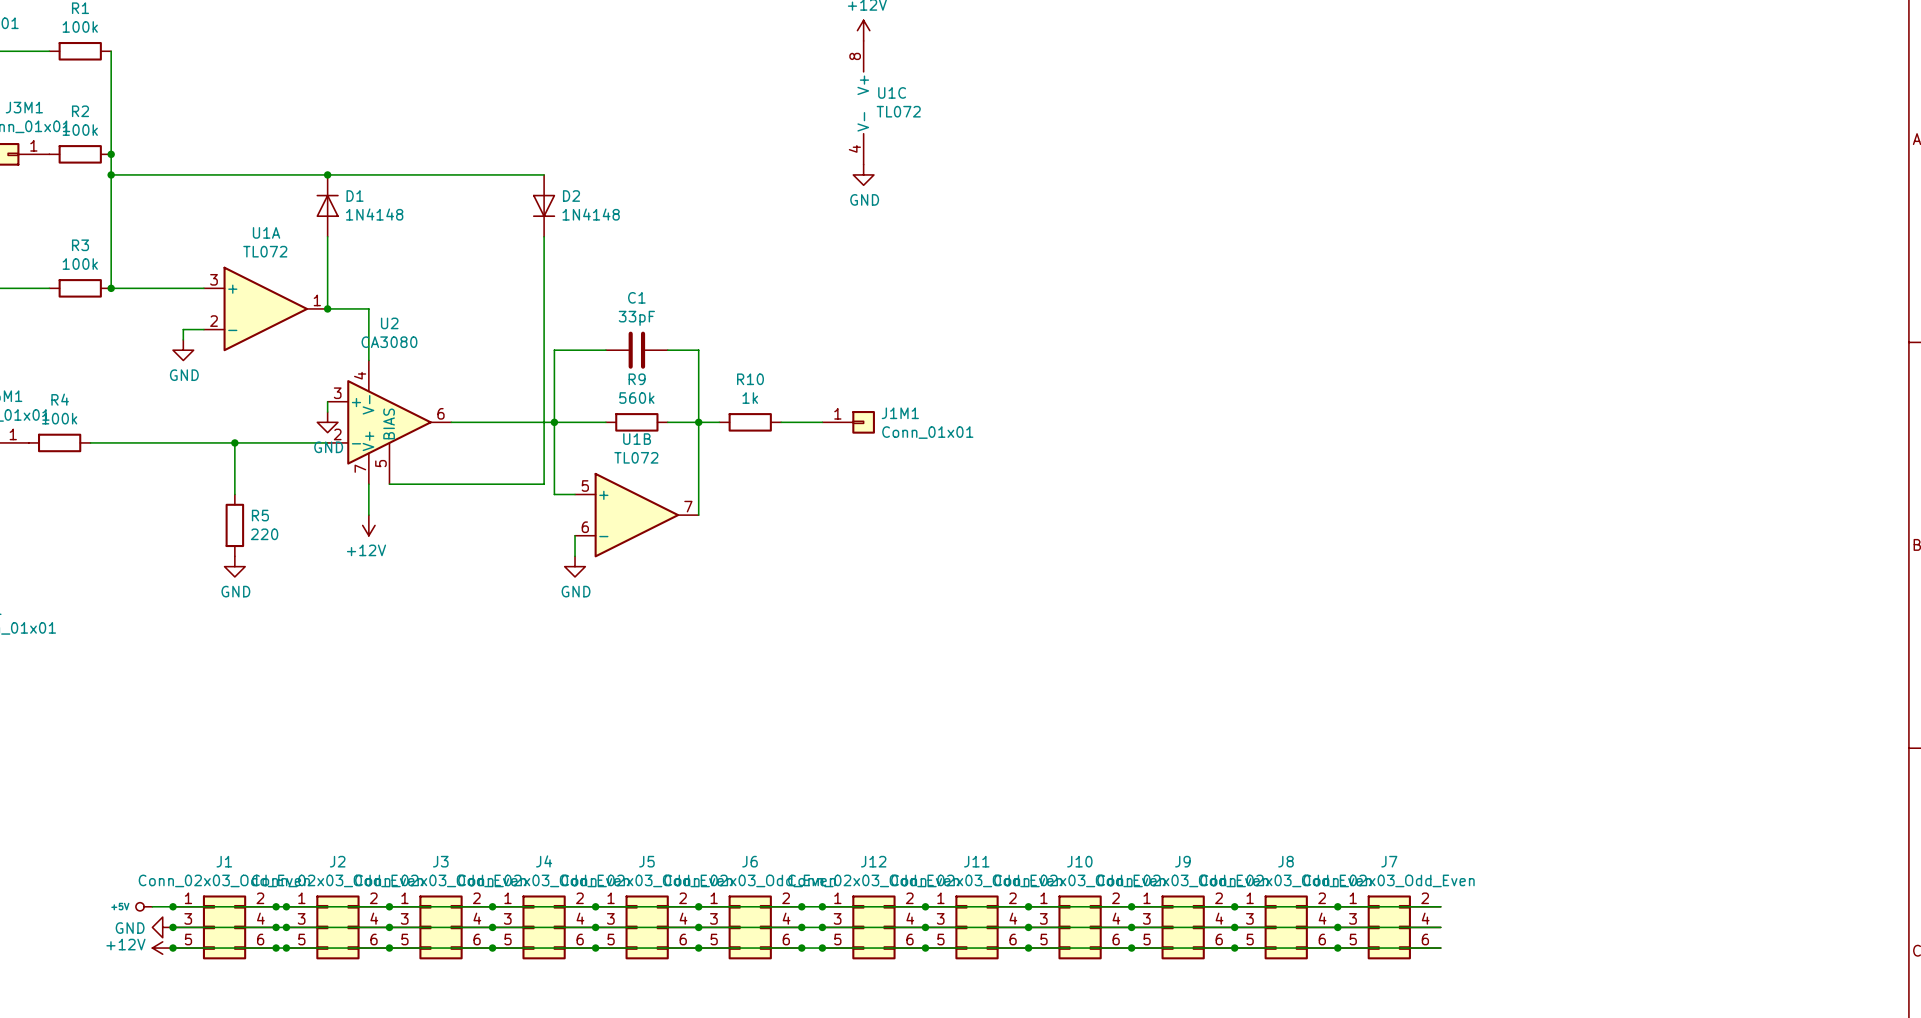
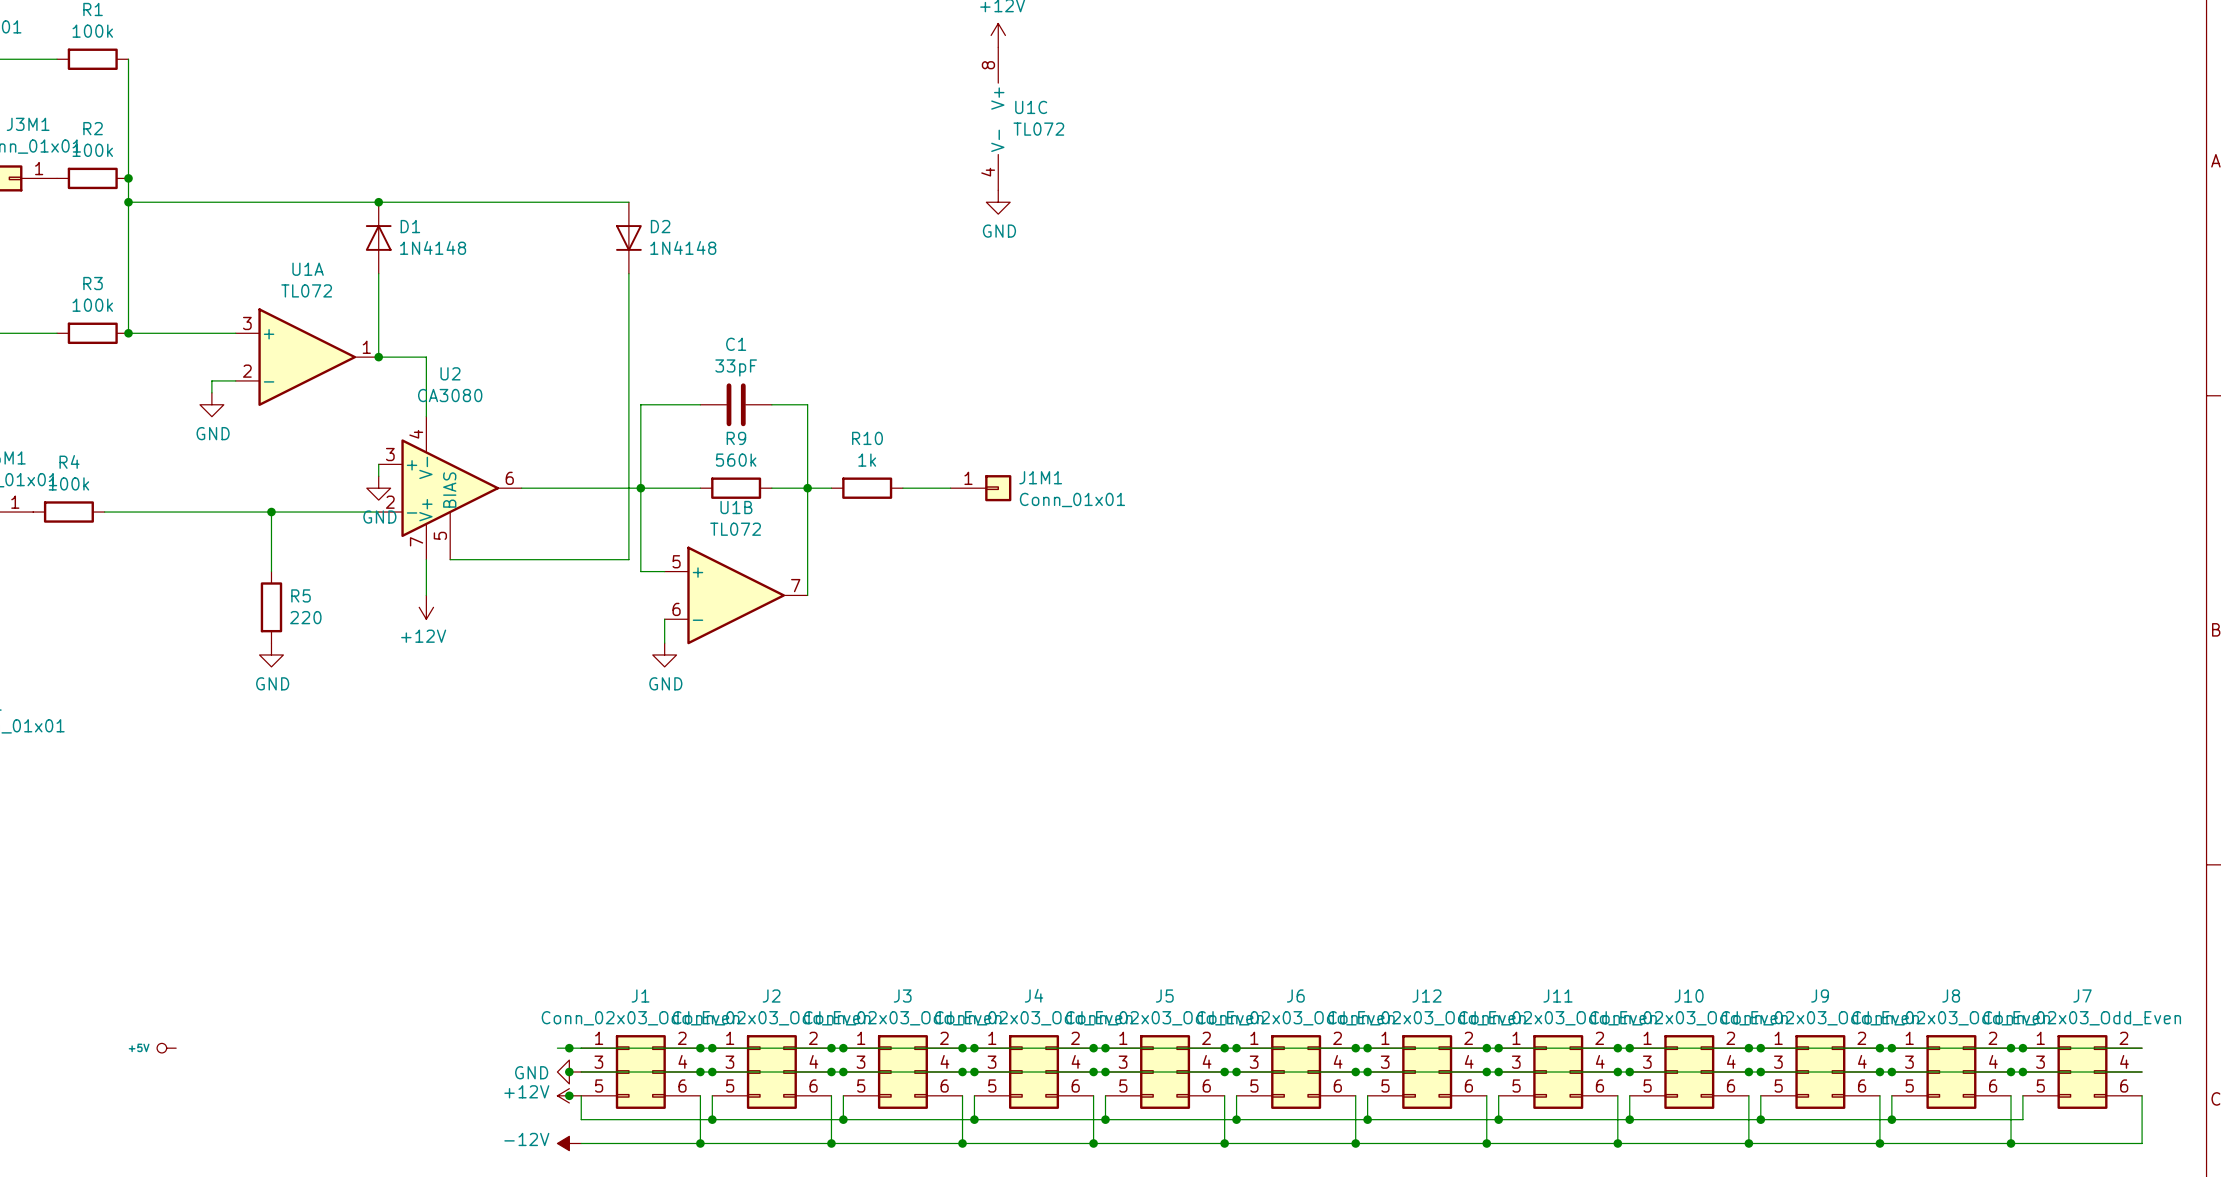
wire: (152, 906) (482, 906) -> none
junction: (173, 906) -> none
junction: (276, 906) -> none
junction: (286, 906) -> none
junction: (389, 906) -> none
junction: (595, 906) -> none
junction: none -> (700, 1048)
junction: none -> (712, 1048)
junction: (698, 906) -> none
junction: none -> (831, 1048)
junction: none -> (843, 1048)
junction: (801, 906) -> none
junction: (822, 906) -> none
junction: none -> (962, 1048)
junction: none -> (974, 1048)
junction: (925, 906) -> none
junction: none -> (1093, 1048)
junction: none -> (1105, 1048)
junction: (1028, 906) -> none
junction: none -> (1224, 1048)
junction: none -> (1236, 1048)
junction: (1131, 906) -> none
junction: none -> (1355, 1048)
junction: none -> (1367, 1048)
junction: (1234, 906) -> none
junction: none -> (1486, 1048)
junction: none -> (1498, 1048)
junction: (1337, 906) -> none
junction: none -> (1617, 1048)
junction: none -> (1629, 1048)
wire: none -> (1665, 1048) (2142, 1048)
junction: none -> (1748, 1048)
junction: none -> (1760, 1048)
junction: none -> (1879, 1048)
junction: none -> (1891, 1048)
junction: none -> (2011, 1048)
junction: none -> (2022, 1048)
power symbol: GND (162, 927) -> none
wire: (173, 927) (502, 927) -> none
junction: (173, 927) -> none
J1 position: (224, 927) -> (640, 1072)
junction: (276, 927) -> none
junction: (286, 927) -> none
J2 position: (337, 927) -> (771, 1072)
junction: (389, 927) -> none
J3 position: (441, 927) -> (902, 1072)
power symbol: none -> GND (569, 1072)
J4 position: (544, 927) -> (1034, 1072)
junction: (595, 927) -> none
junction: none -> (700, 1072)
junction: none -> (712, 1072)
J5 position: (647, 927) -> (1165, 1072)
junction: (698, 927) -> none
junction: none -> (831, 1072)
junction: none -> (843, 1072)
J6 position: (750, 927) -> (1296, 1072)
junction: (801, 927) -> none
junction: (822, 927) -> none
junction: none -> (962, 1072)
junction: none -> (974, 1072)
J12 position: (873, 927) -> (1427, 1072)
junction: (925, 927) -> none
junction: none -> (1093, 1072)
junction: none -> (1105, 1072)
J11 position: (977, 927) -> (1558, 1072)
junction: (1028, 927) -> none
junction: none -> (1224, 1072)
junction: none -> (1236, 1072)
J10 position: (1080, 927) -> (1689, 1072)
junction: (1131, 927) -> none
junction: none -> (1355, 1072)
J9 position: (1183, 927) -> (1820, 1072)
junction: none -> (1367, 1072)
junction: (1234, 927) -> none
J8 position: (1286, 927) -> (1951, 1072)
junction: none -> (1486, 1072)
junction: none -> (1498, 1072)
junction: (1337, 927) -> none
J7 position: (1389, 927) -> (2082, 1072)
junction: none -> (1617, 1072)
junction: none -> (1629, 1072)
wire: none -> (1665, 1072) (2142, 1072)
junction: none -> (1748, 1072)
junction: none -> (1760, 1072)
junction: none -> (1879, 1072)
junction: none -> (1891, 1072)
junction: none -> (2011, 1072)
junction: none -> (2022, 1072)
power symbol: +12V (162, 948) -> none
junction: (173, 948) -> none
junction: (276, 948) -> none
junction: (286, 948) -> none
junction: (389, 948) -> none
power symbol: none -> +12V (569, 1095)
wire: none -> (581, 1095) (581, 1119) (2022, 1119) (2022, 1095)
junction: (595, 948) -> none
wire: none -> (700, 1095) (700, 1143)
wire: none -> (712, 1095) (712, 1119)
junction: (698, 948) -> none
wire: none -> (831, 1095) (831, 1143)
junction: (801, 948) -> none
junction: (822, 948) -> none
wire: none -> (962, 1095) (962, 1143)
wire: none -> (974, 1095) (974, 1119)
junction: (925, 948) -> none
wire: none -> (1093, 1095) (1093, 1143)
junction: (1028, 948) -> none
wire: none -> (1224, 1095) (1224, 1143)
junction: (1131, 948) -> none
wire: none -> (1355, 1095) (1355, 1143)
junction: (1234, 948) -> none
wire: none -> (1486, 1095) (1486, 1143)
junction: (1337, 948) -> none
wire: none -> (1617, 1095) (1617, 1143)
wire: none -> (1748, 1095) (1748, 1143)
wire: none -> (1760, 1095) (1760, 1119)
wire: none -> (1879, 1095) (1879, 1143)
wire: none -> (1891, 1095) (1891, 1119)
wire: none -> (2011, 1095) (2011, 1143)
wire: none -> (2142, 1095) (2142, 1143) (581, 1143)
junction: none -> (712, 1119)
junction: none -> (843, 1119)
junction: none -> (974, 1119)
junction: none -> (1105, 1119)
junction: none -> (1236, 1119)
junction: none -> (1367, 1119)
junction: none -> (1498, 1119)
junction: none -> (1629, 1119)
junction: none -> (1760, 1119)
junction: none -> (1891, 1119)
power symbol: none -> -12V (569, 1143)
junction: none -> (700, 1143)
junction: none -> (831, 1143)
junction: none -> (962, 1143)
junction: none -> (1093, 1143)
junction: none -> (1224, 1143)
junction: none -> (1355, 1143)
junction: none -> (1486, 1143)
junction: none -> (1617, 1143)
junction: none -> (1748, 1143)
junction: none -> (1879, 1143)
junction: none -> (2011, 1143)

